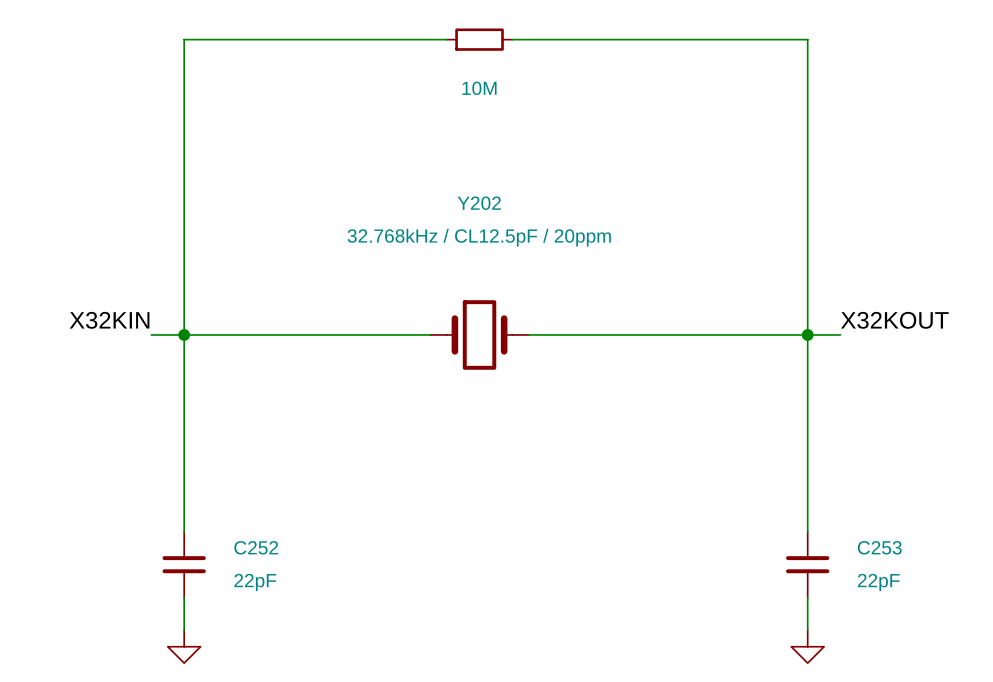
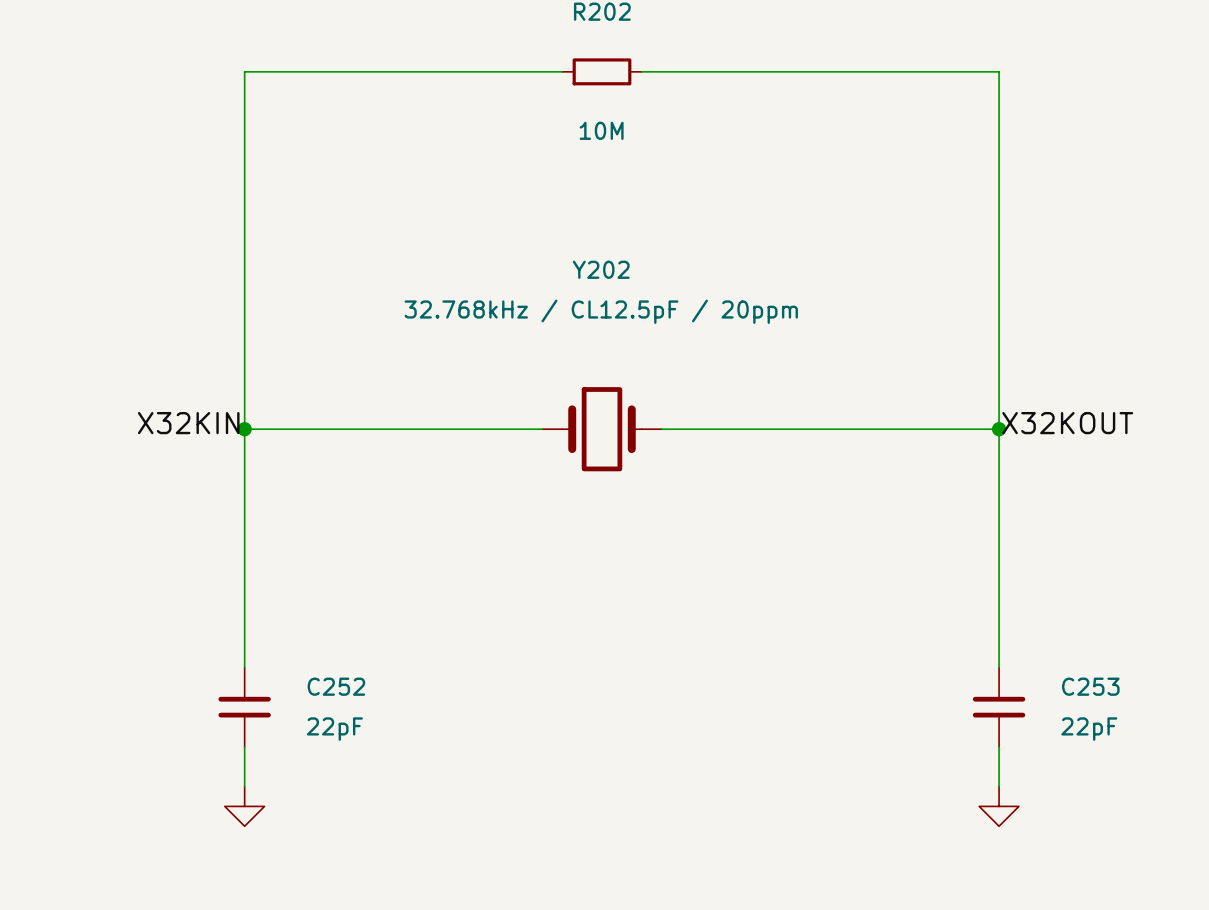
label position: X32KIN (109, 320) -> X32KIN (188, 423)
label position: X32KOUT (894, 320) -> X32KOUT (1067, 423)
wire: (151, 334) (184, 334) -> none
wire: (807, 334) (840, 334) -> none

